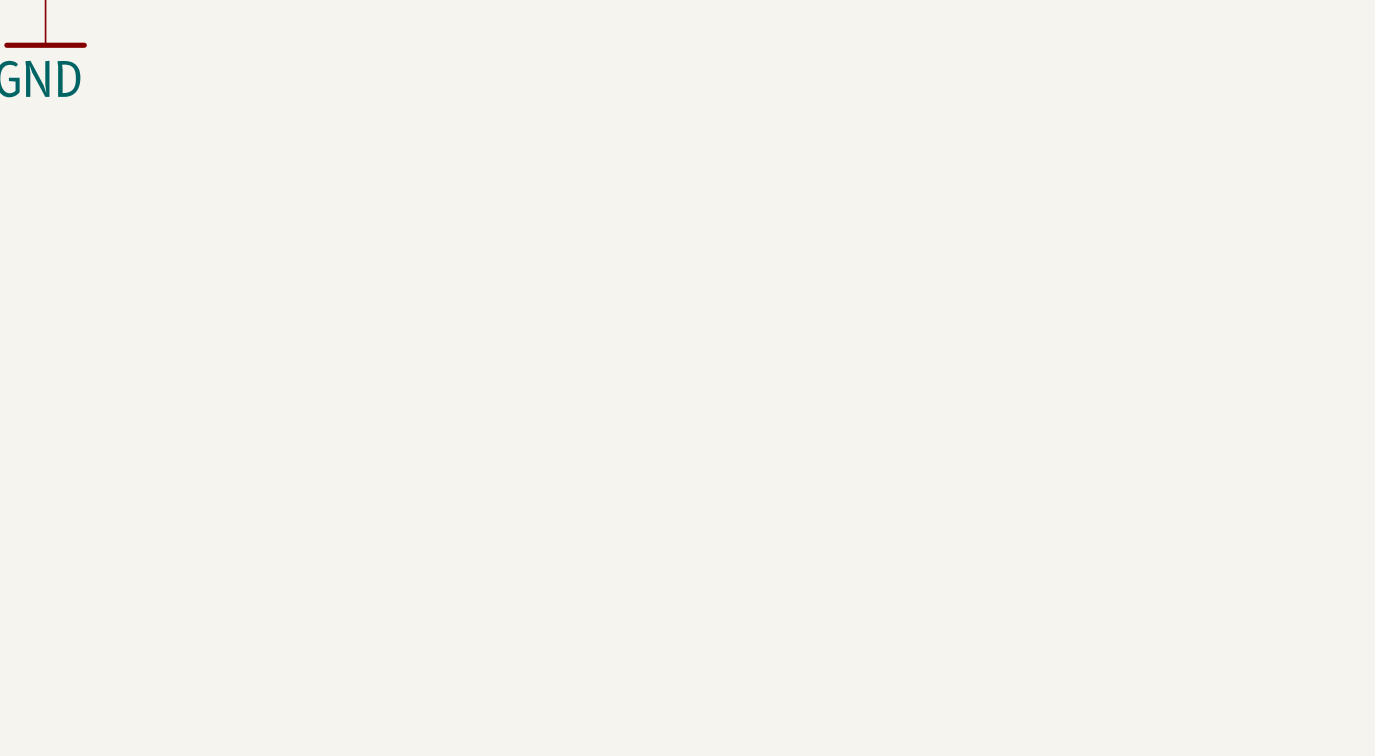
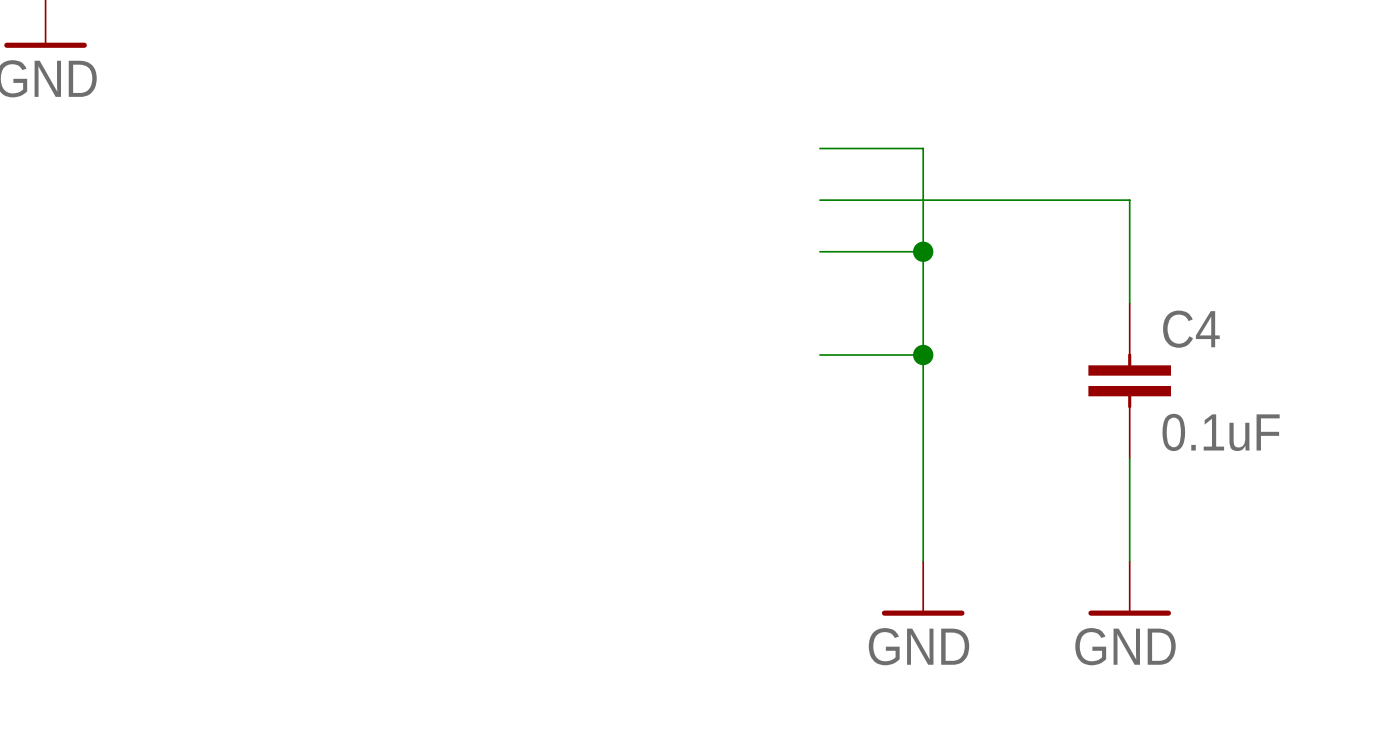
wire: none -> (819, 148) (923, 148) (923, 561)
wire: none -> (819, 200) (1129, 200) (1129, 303)
wire: none -> (819, 251) (923, 251)
junction: none -> (923, 251)
wire: none -> (819, 355) (923, 355)
junction: none -> (923, 355)
C4: none -> 0.1uF (1129, 380)
wire: none -> (1129, 458) (1129, 561)
power symbol: none -> GND (923, 588)
power symbol: none -> GND (1129, 588)

